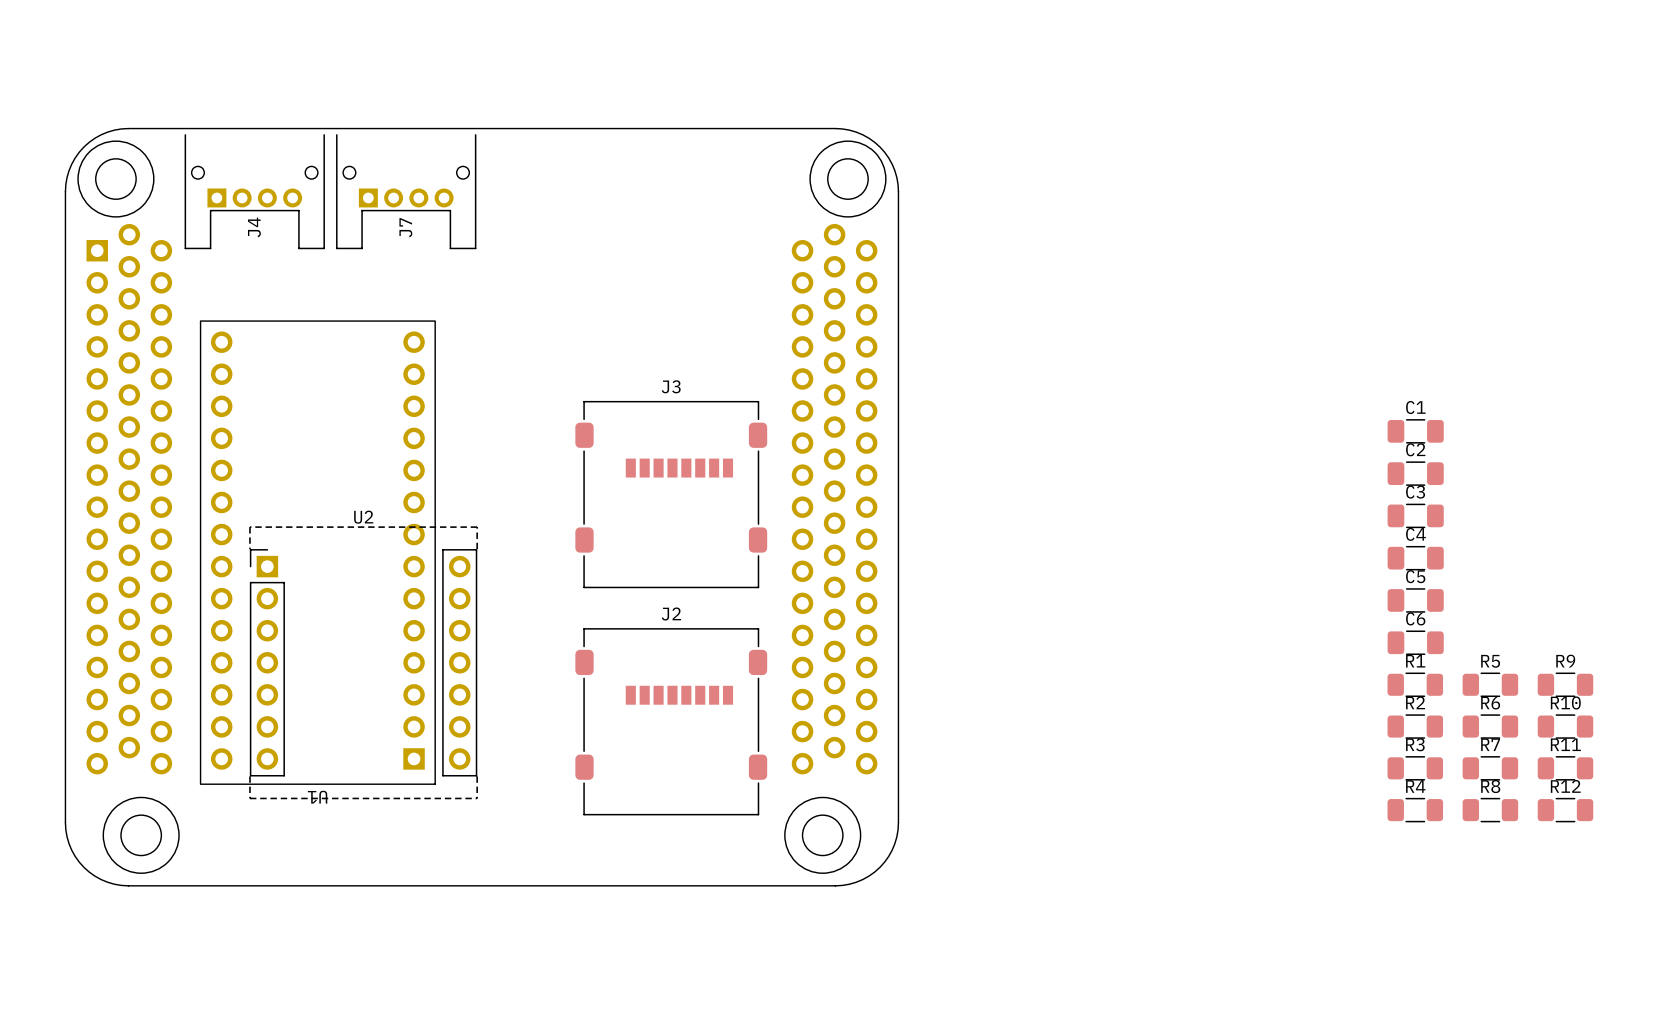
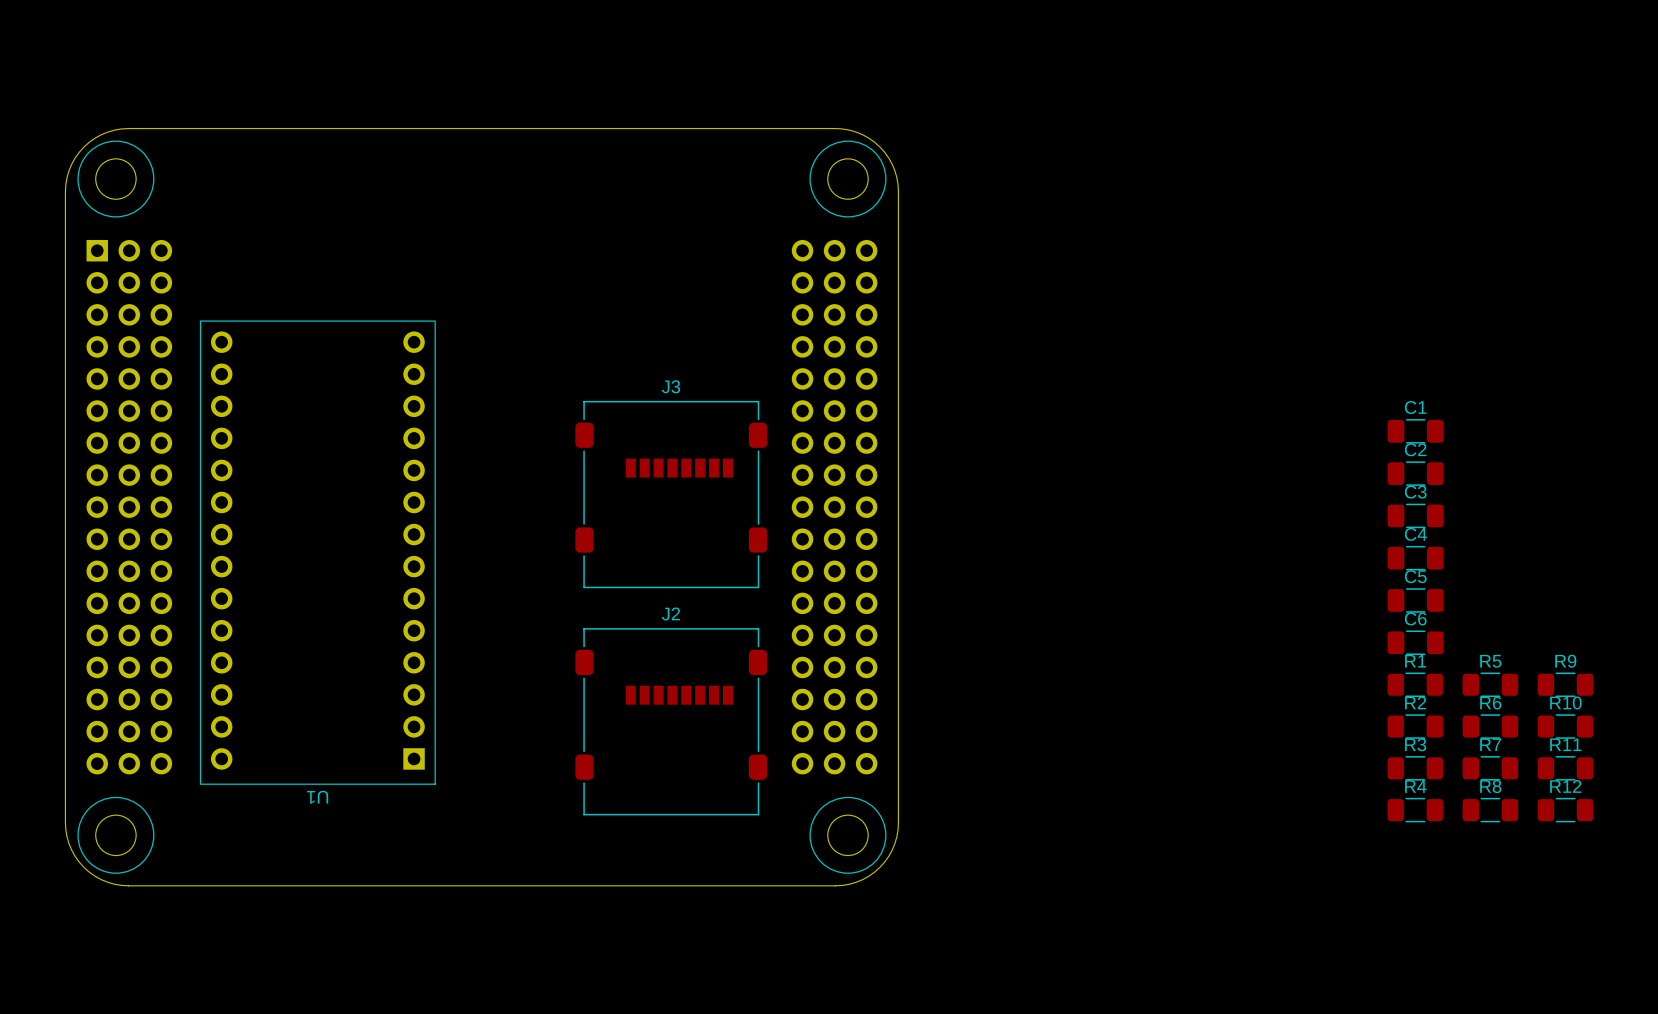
part footprint: [65, 128, 899, 887] -> [65, 128, 899, 887]
J4: (254, 191) -> none
J7: (406, 191) -> none
U2: (363, 662) -> none

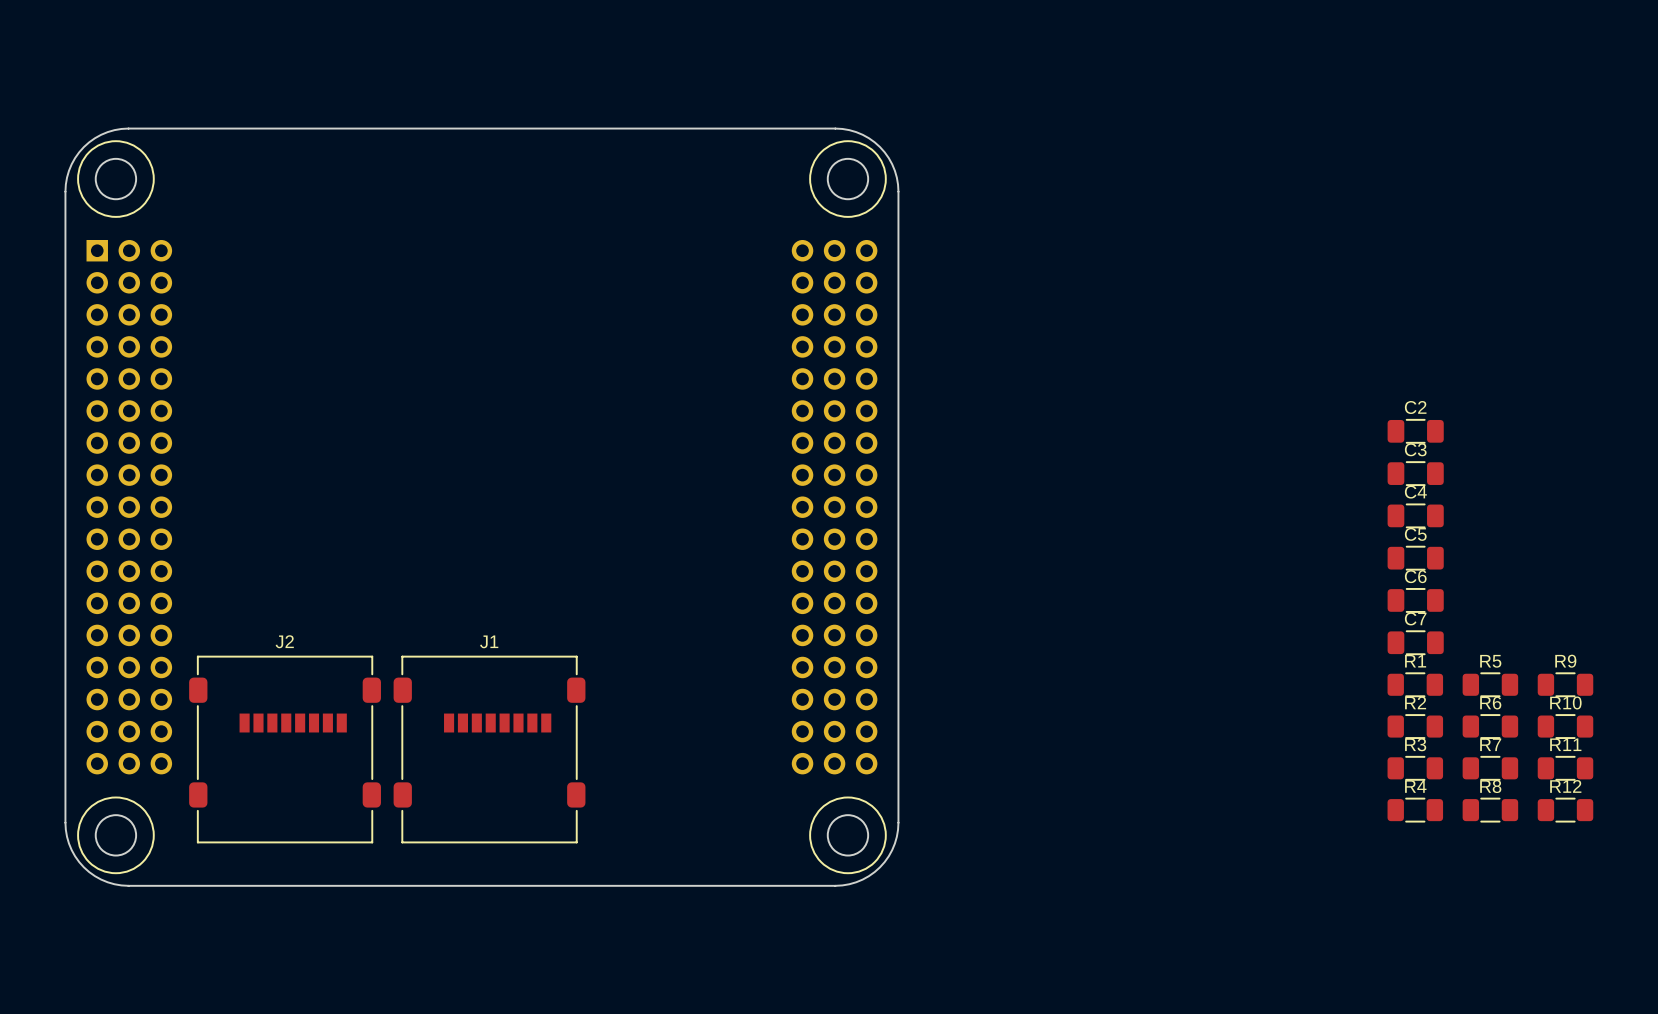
C1 name: C1 (1415, 407) -> C2 (1415, 407)
C2 name: C2 (1415, 449) -> C3 (1415, 449)
C3 name: C3 (1415, 492) -> C4 (1415, 492)
J3: (671, 494) -> none
C4 name: C4 (1415, 534) -> C5 (1415, 534)
U1: (317, 552) -> none
C5 name: C5 (1415, 576) -> C6 (1415, 576)
C6 name: C6 (1415, 618) -> C7 (1415, 618)
J2 position: (671, 721) -> (285, 749)
J1: none -> (489, 749)

